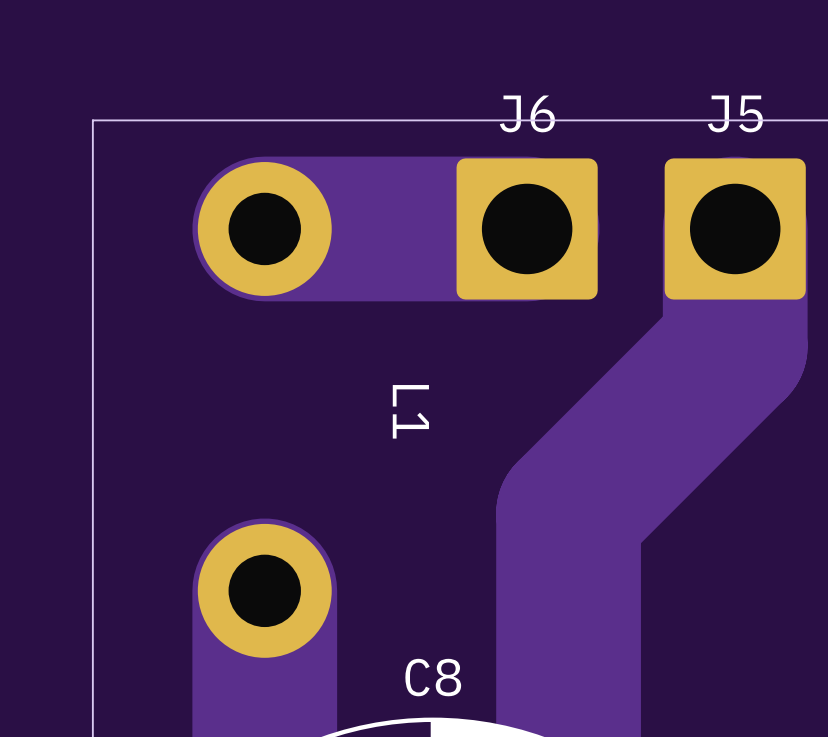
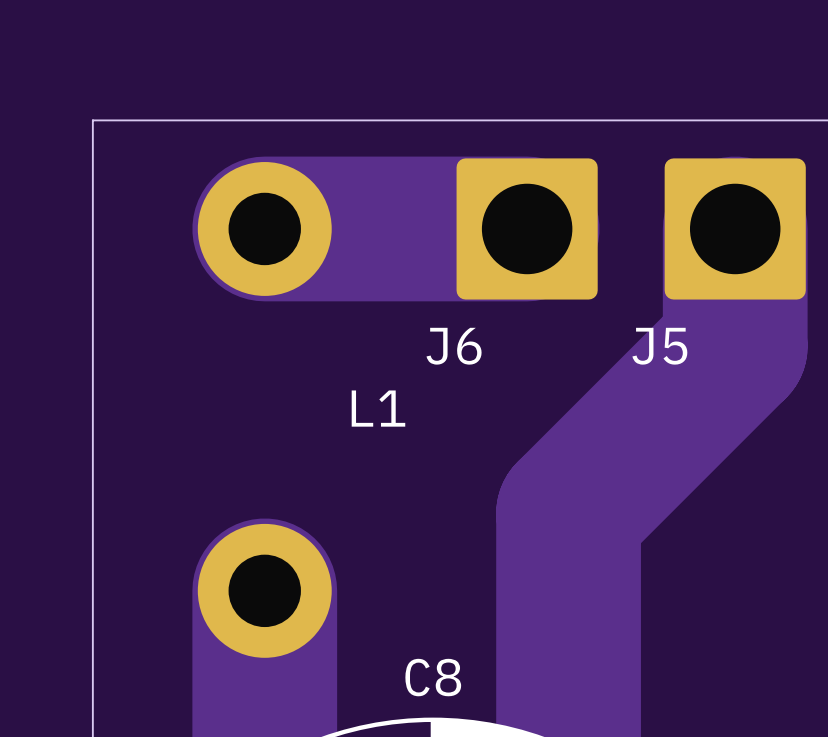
J6 name position: J6 (527, 113) -> J6 (454, 346)
J5 name position: J5 (735, 113) -> J5 (659, 346)
L1 name rotation: 0° (410, 411) -> 90° counterclockwise (378, 408)

